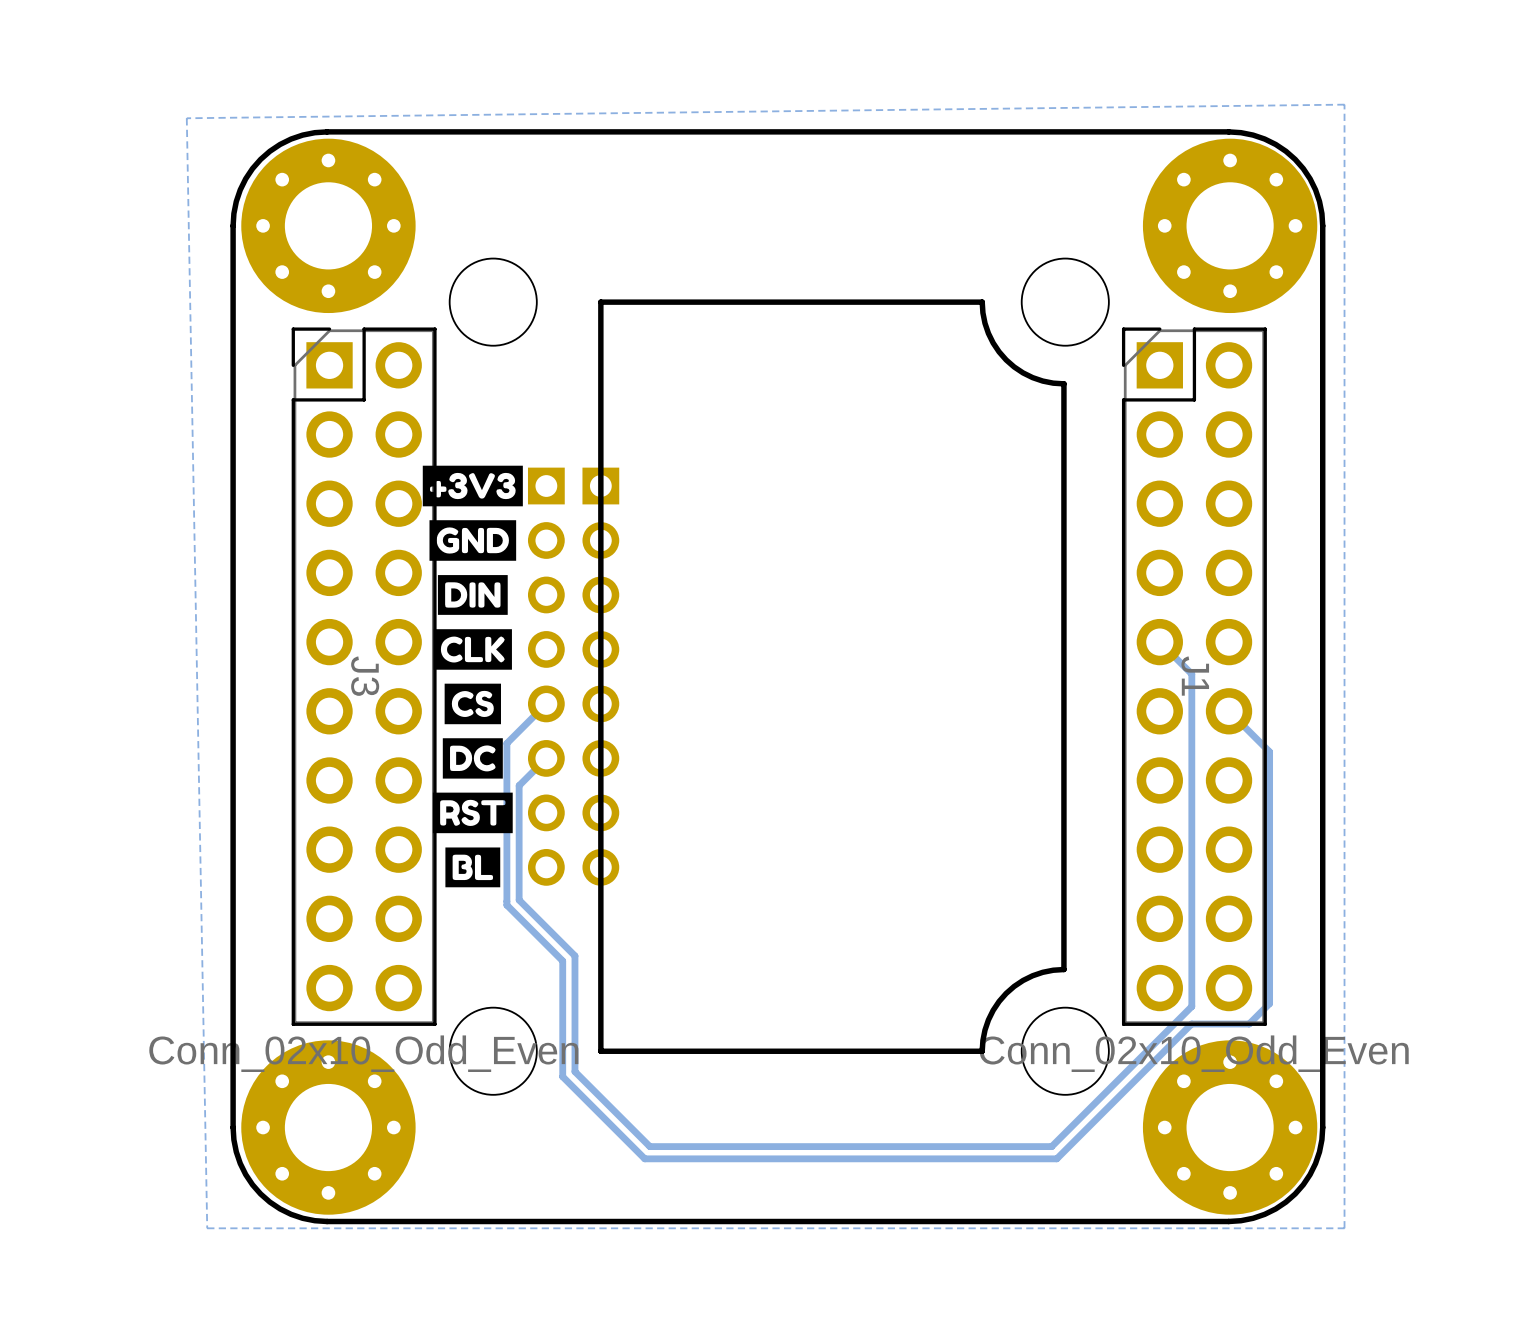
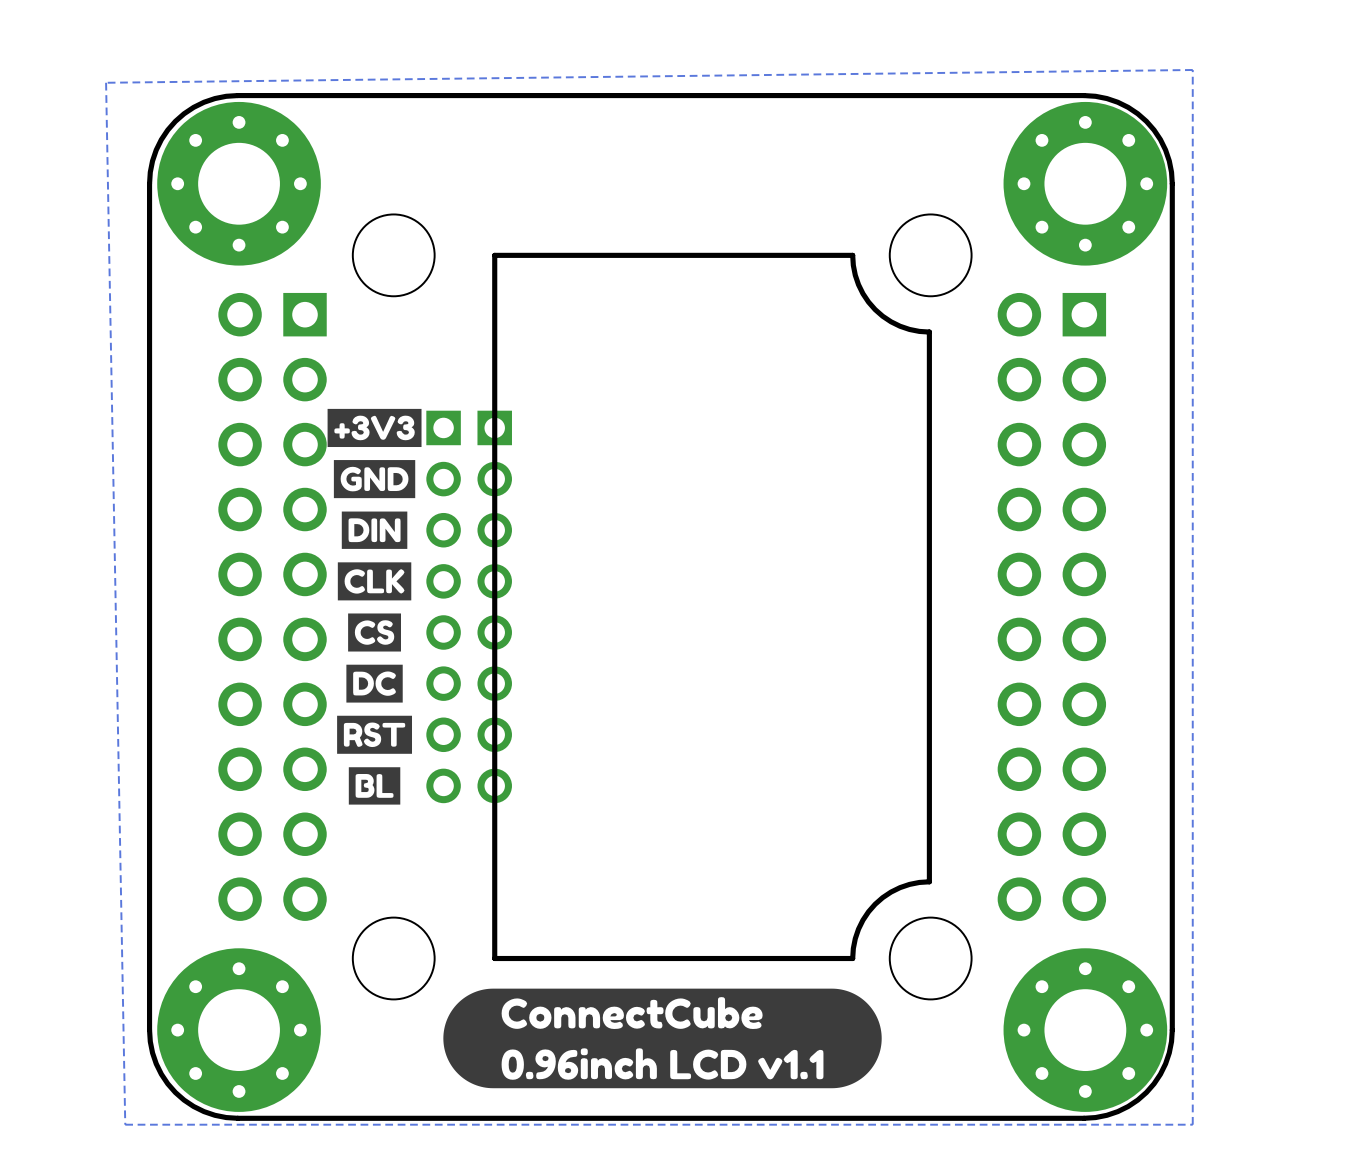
track: (1159, 642) (1191, 674) (1191, 1006) (1051, 1146) (649, 1146) (574, 1071) (574, 955) (519, 900) (519, 785) (546, 758) -> none
J3 side: bottom (364, 676) -> top (272, 606)
J1 side: bottom (1194, 676) -> top (1051, 606)
track: (546, 703) (506, 743) (506, 905) (562, 960) (562, 1076) (644, 1158) (1056, 1158) (1191, 1024) (1249, 1024) (1269, 1003) (1269, 751) (1229, 711) -> none
drawing: none -> [443, 988, 882, 1089]

